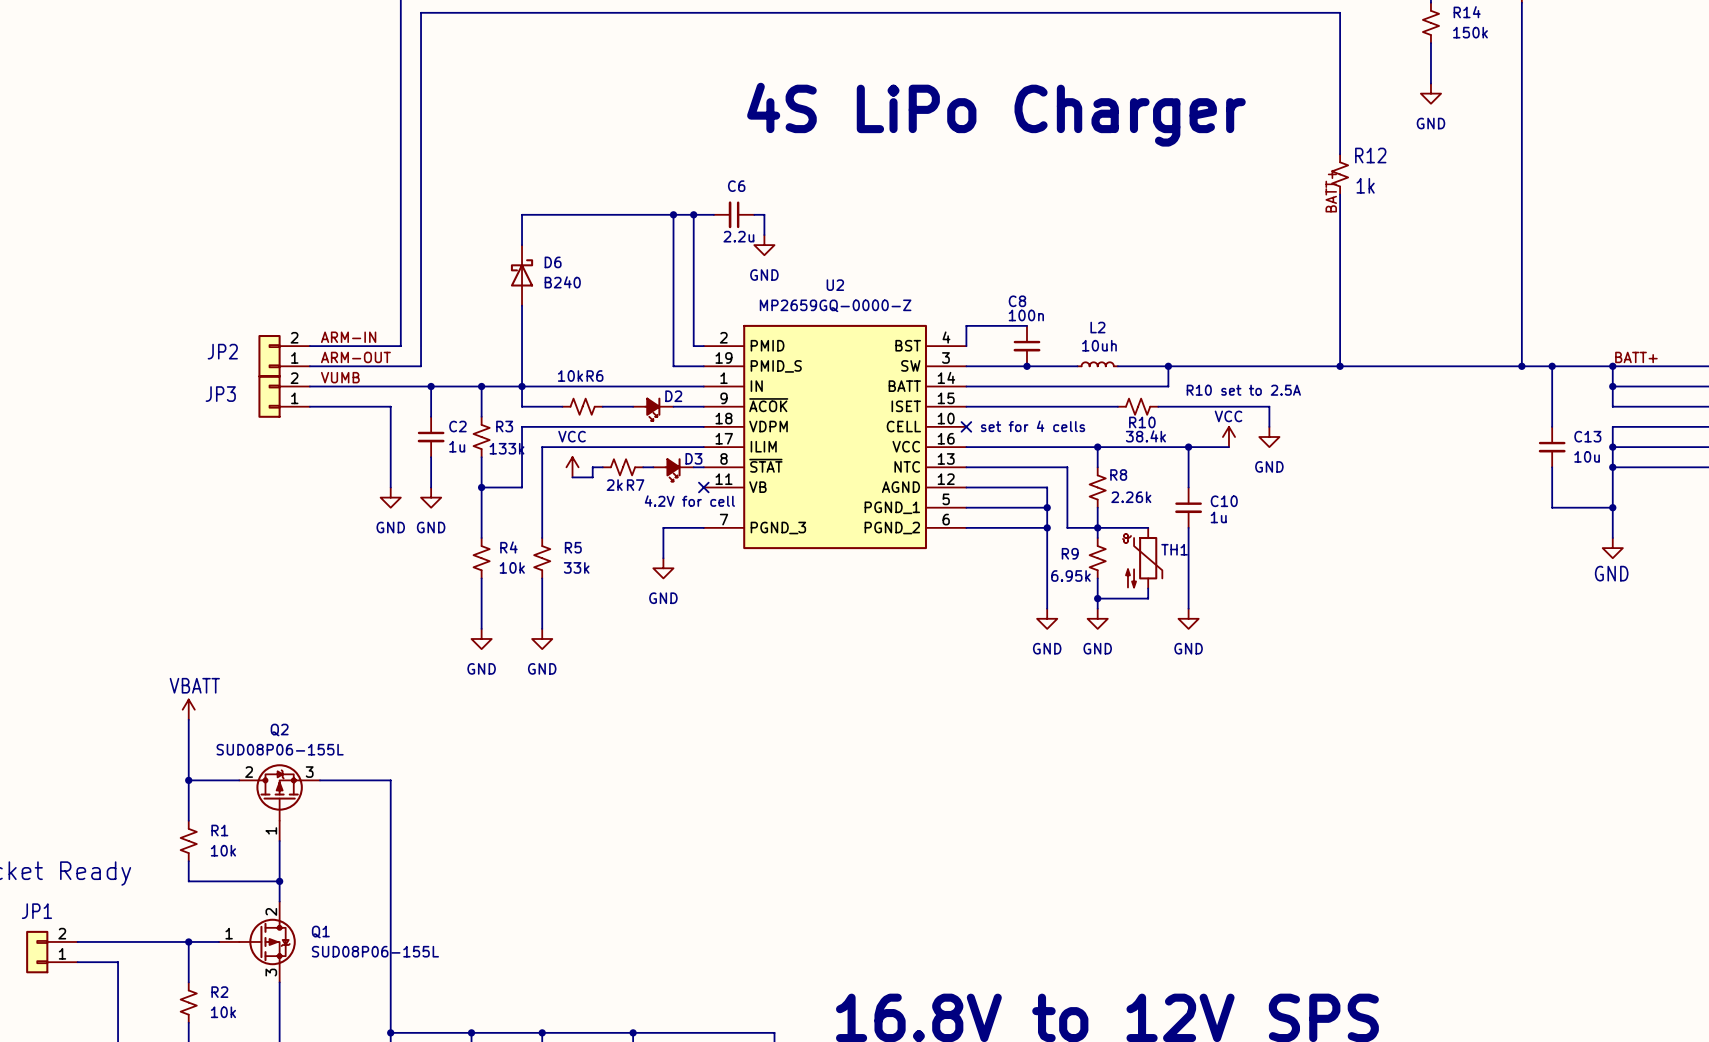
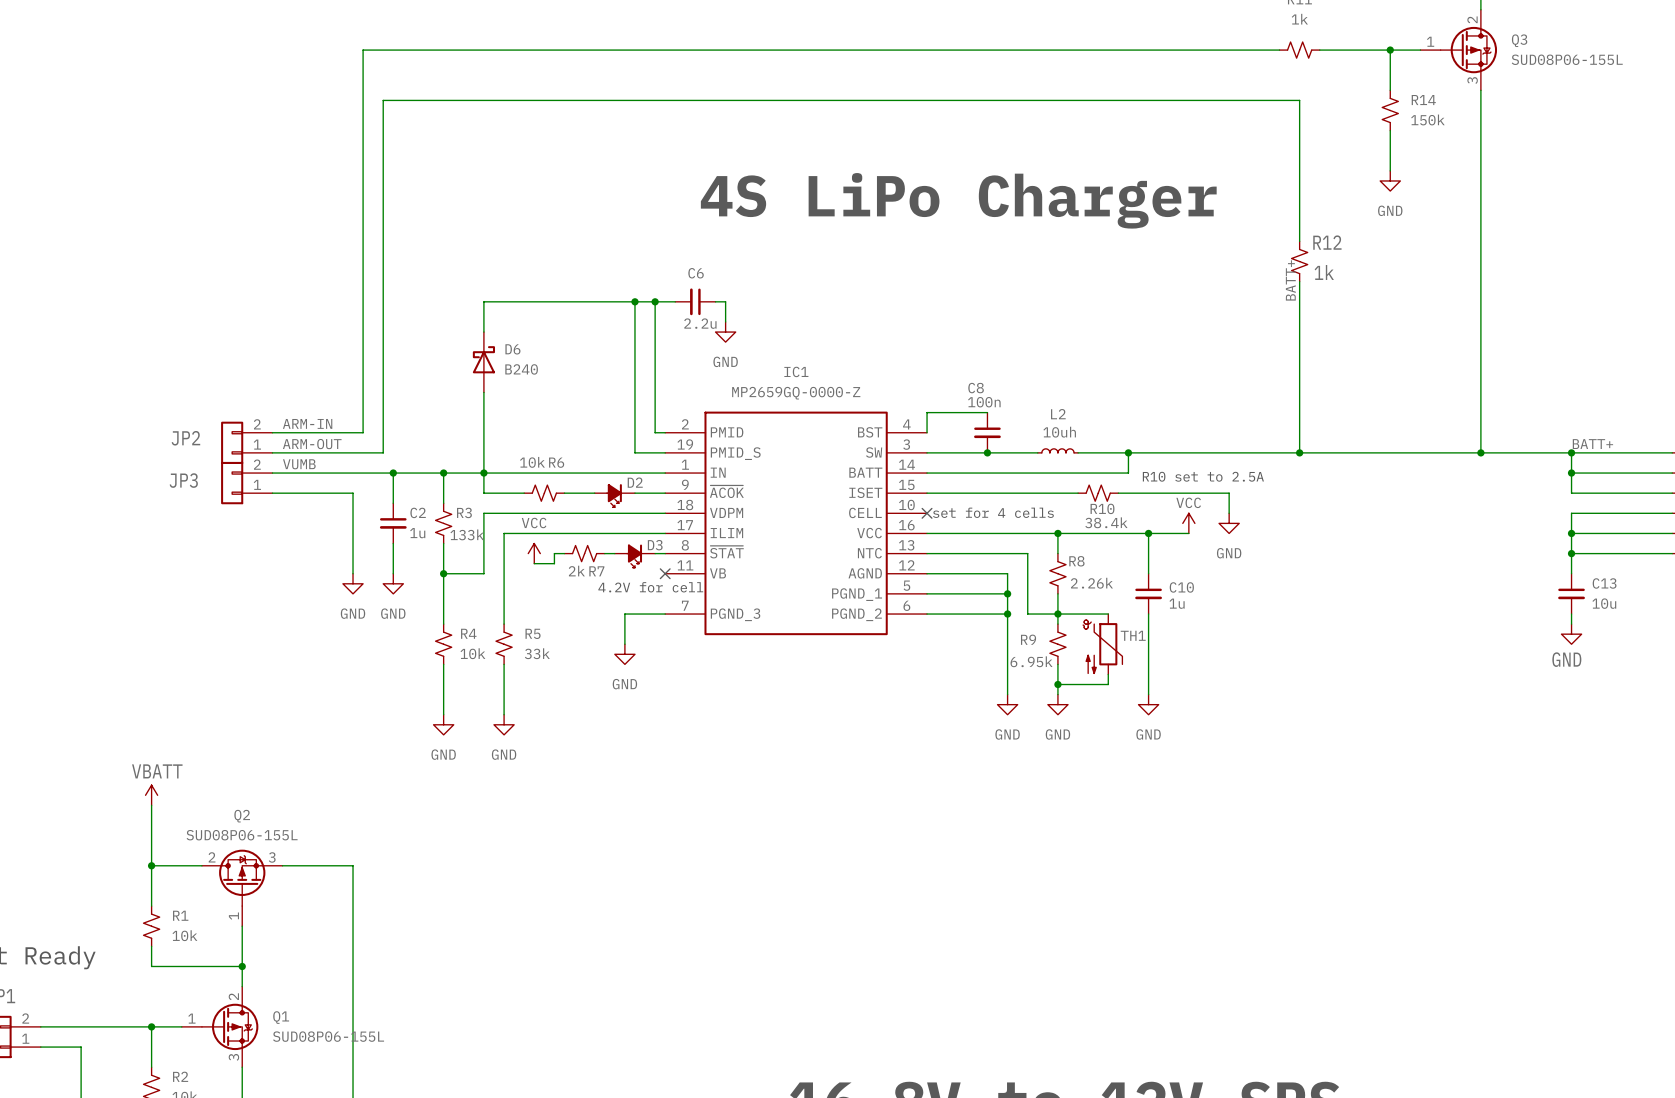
U2 name: U2 (835, 285) -> IC1 (796, 371)
wire: (1552, 366) (1552, 426) -> none
junction: (1552, 366) -> none
C13 position: (1552, 447) -> (1571, 593)
wire: (1552, 467) (1552, 507) (1612, 507) -> none
junction: (1612, 507) -> none

